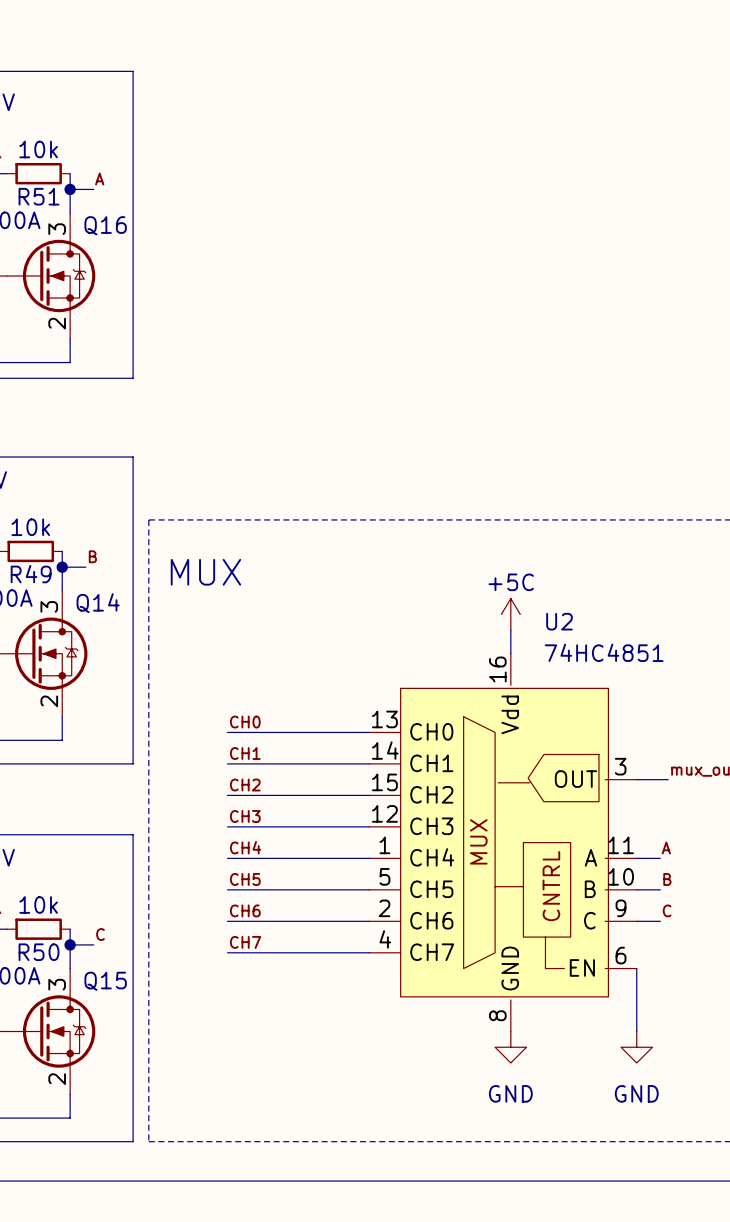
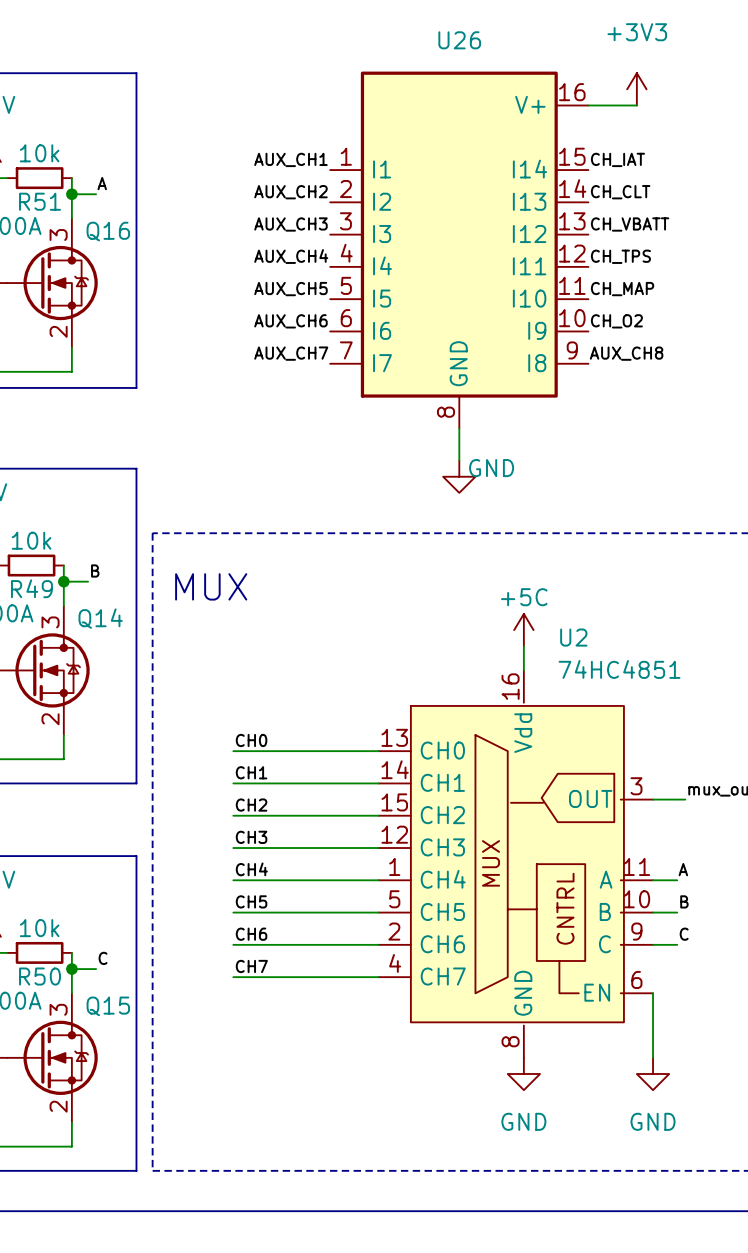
power symbol: none -> +3V3 (636, 89)
wire: none -> (588, 105) (636, 105)
label: none -> AUX_CH1 (290, 159)
label: none -> CH_IAT (617, 159)
label: none -> AUX_CH2 (290, 192)
label: none -> CH_CLT (620, 192)
label: none -> AUX_CH3 (290, 224)
label: none -> CH_VBATT (630, 224)
U26: none -> (459, 249)
label: none -> AUX_CH4 (291, 256)
label: none -> CH_TPS (620, 256)
label: none -> AUX_CH5 (290, 289)
label: none -> CH_MAP (622, 289)
label: none -> AUX_CH6 (290, 321)
label: none -> CH_O2 (616, 321)
label: none -> AUX_CH7 (291, 353)
label: none -> AUX_CH8 (626, 353)
wire: none -> (459, 428) (459, 460)
power symbol: none -> GND (459, 476)

